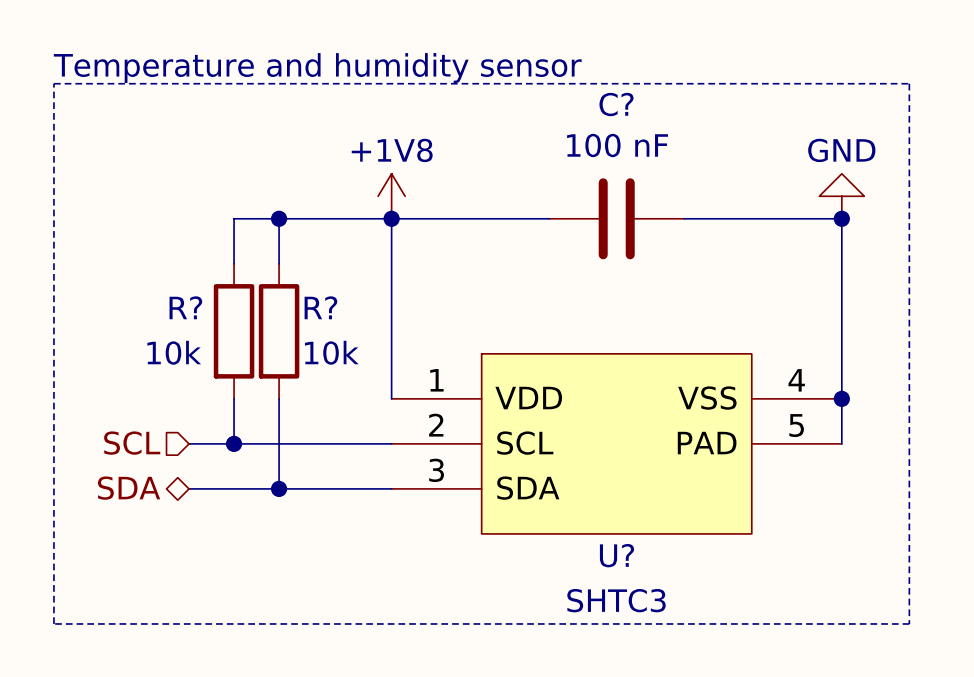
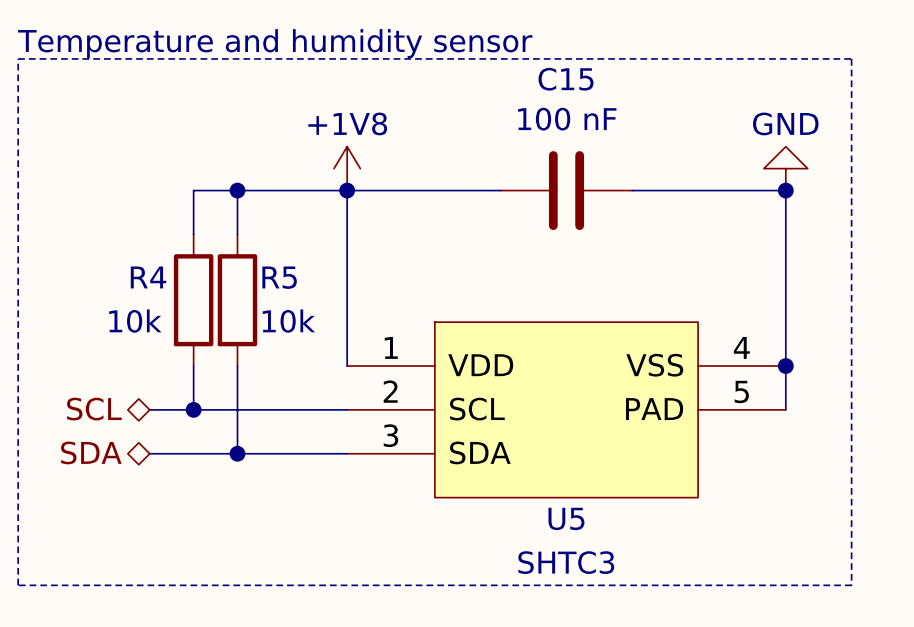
C? name: C? (616, 104) -> C15 (566, 79)
R? name: R? (185, 307) -> R4 (148, 277)
R? name: R? (320, 307) -> R5 (279, 277)
hierarchical label shape: input (132, 443) -> bidirectional (94, 409)
U? name: U? (616, 555) -> U5 (566, 518)

